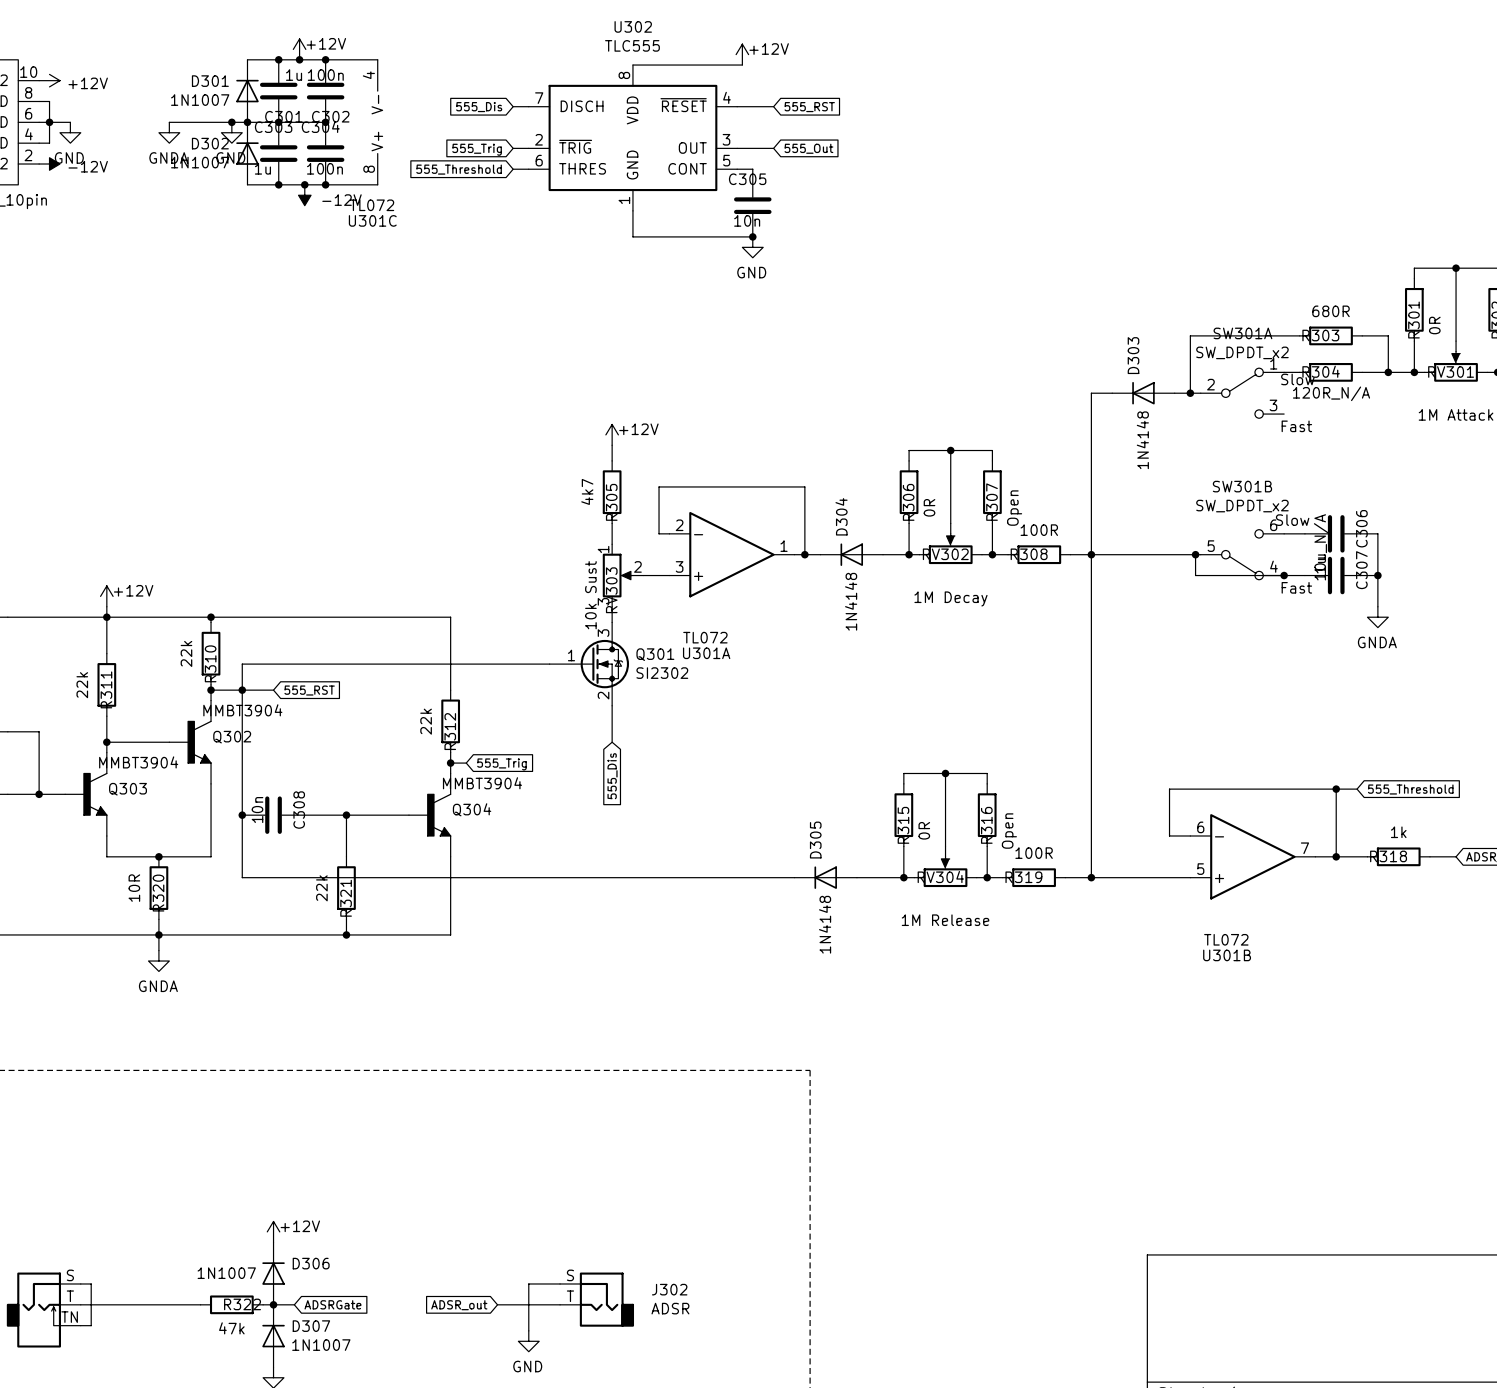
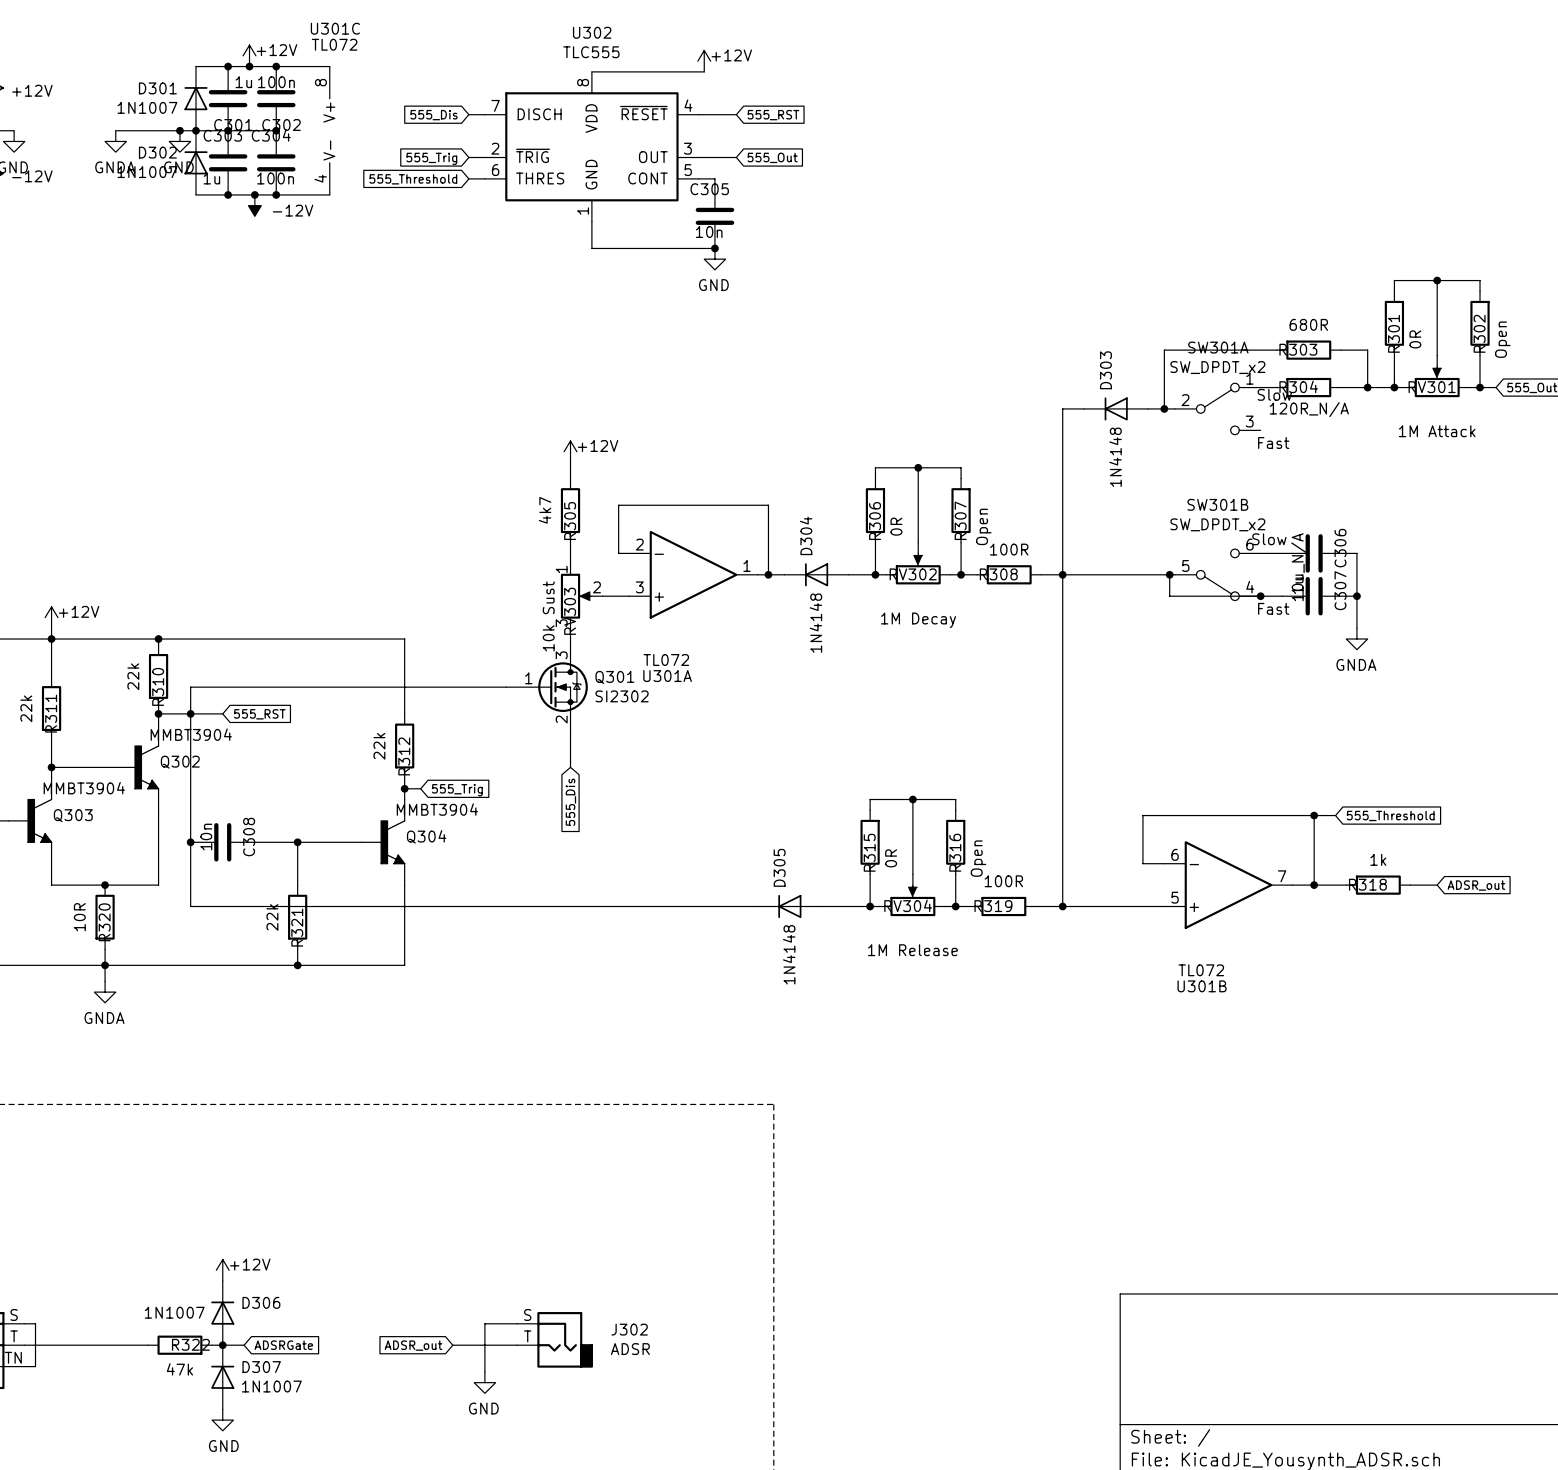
U301C rotation: 0° (377, 122) -> 180° (329, 130)

